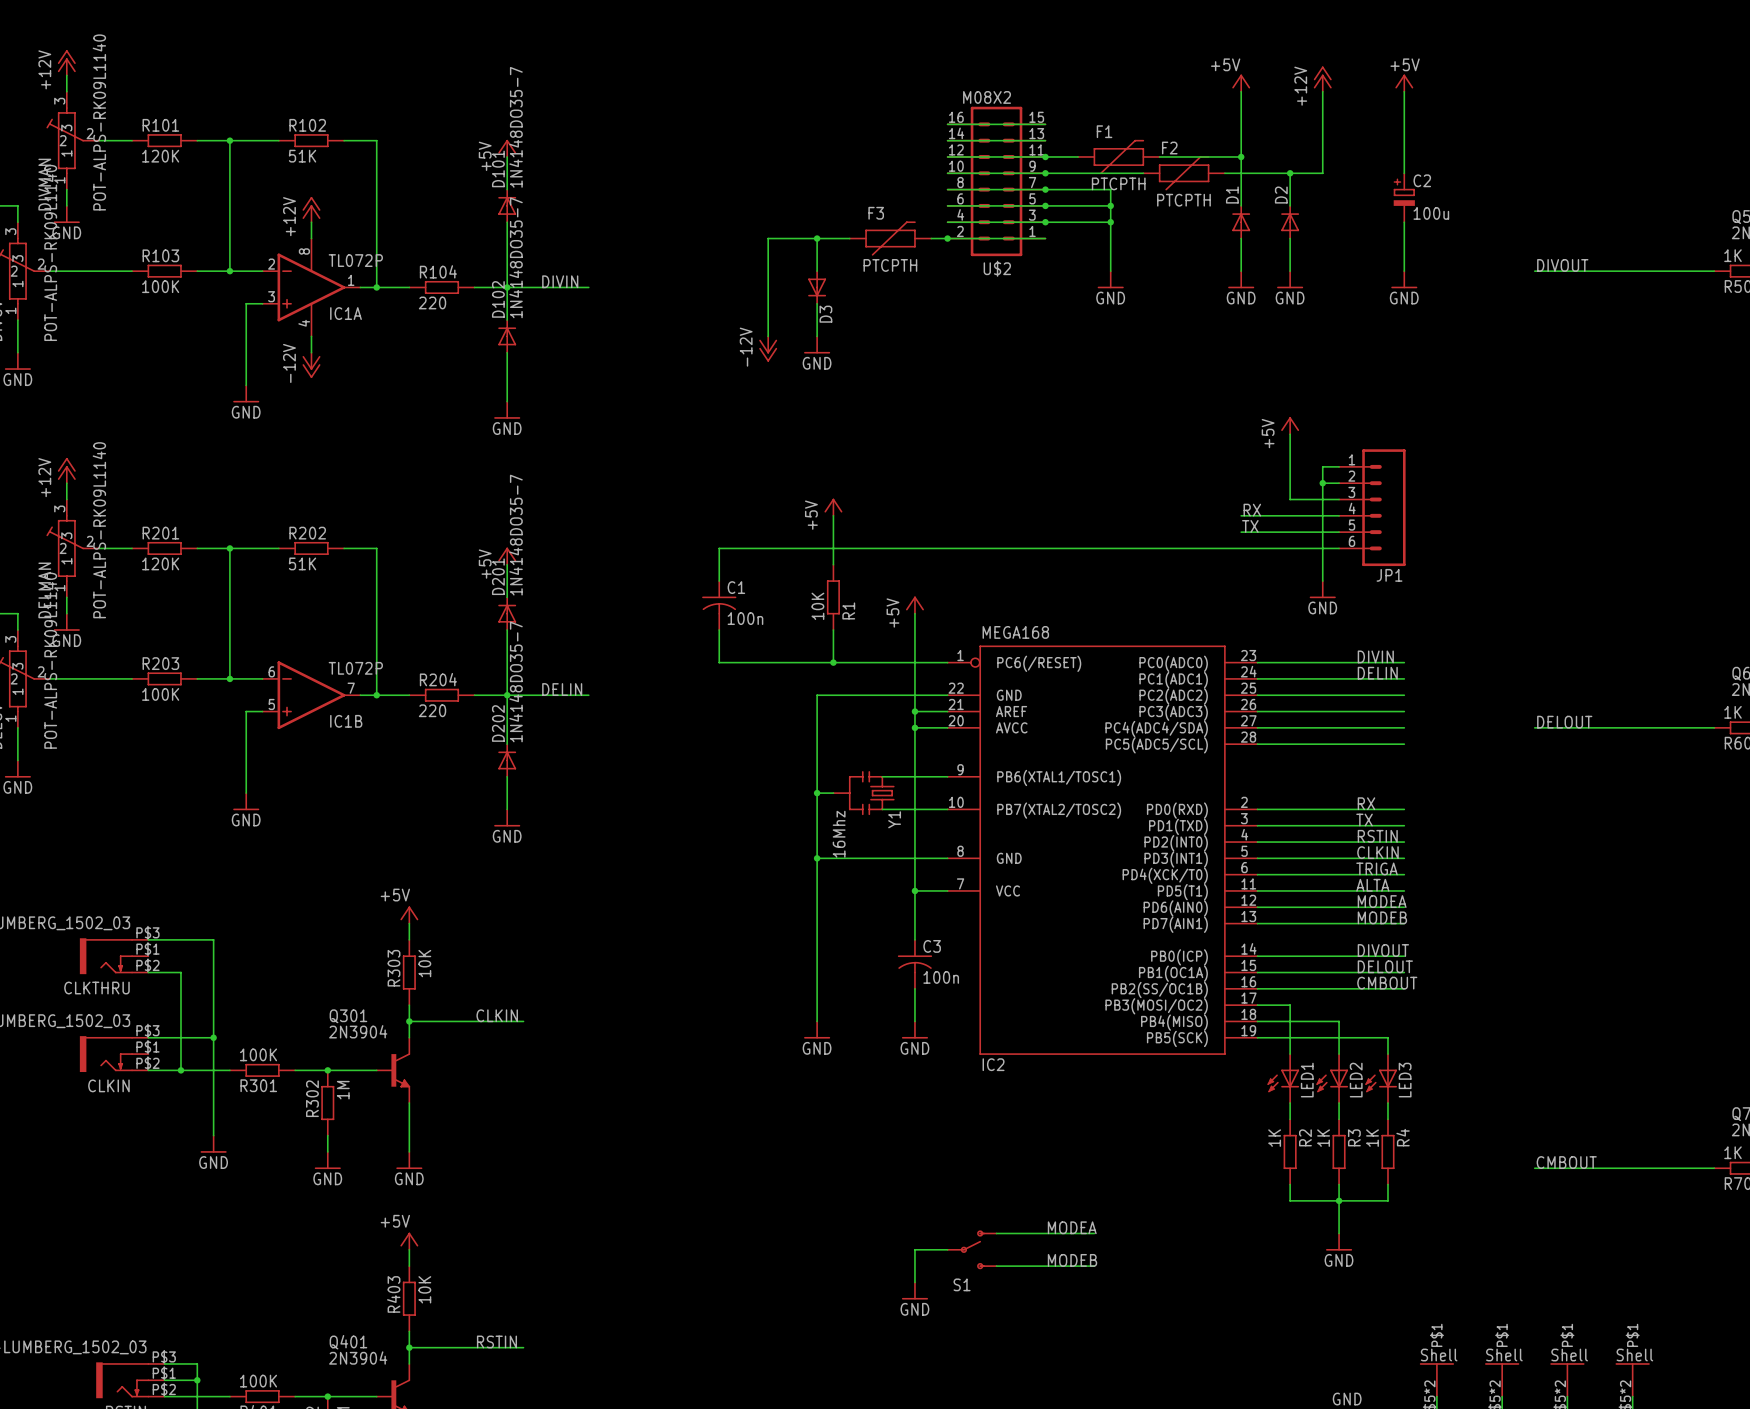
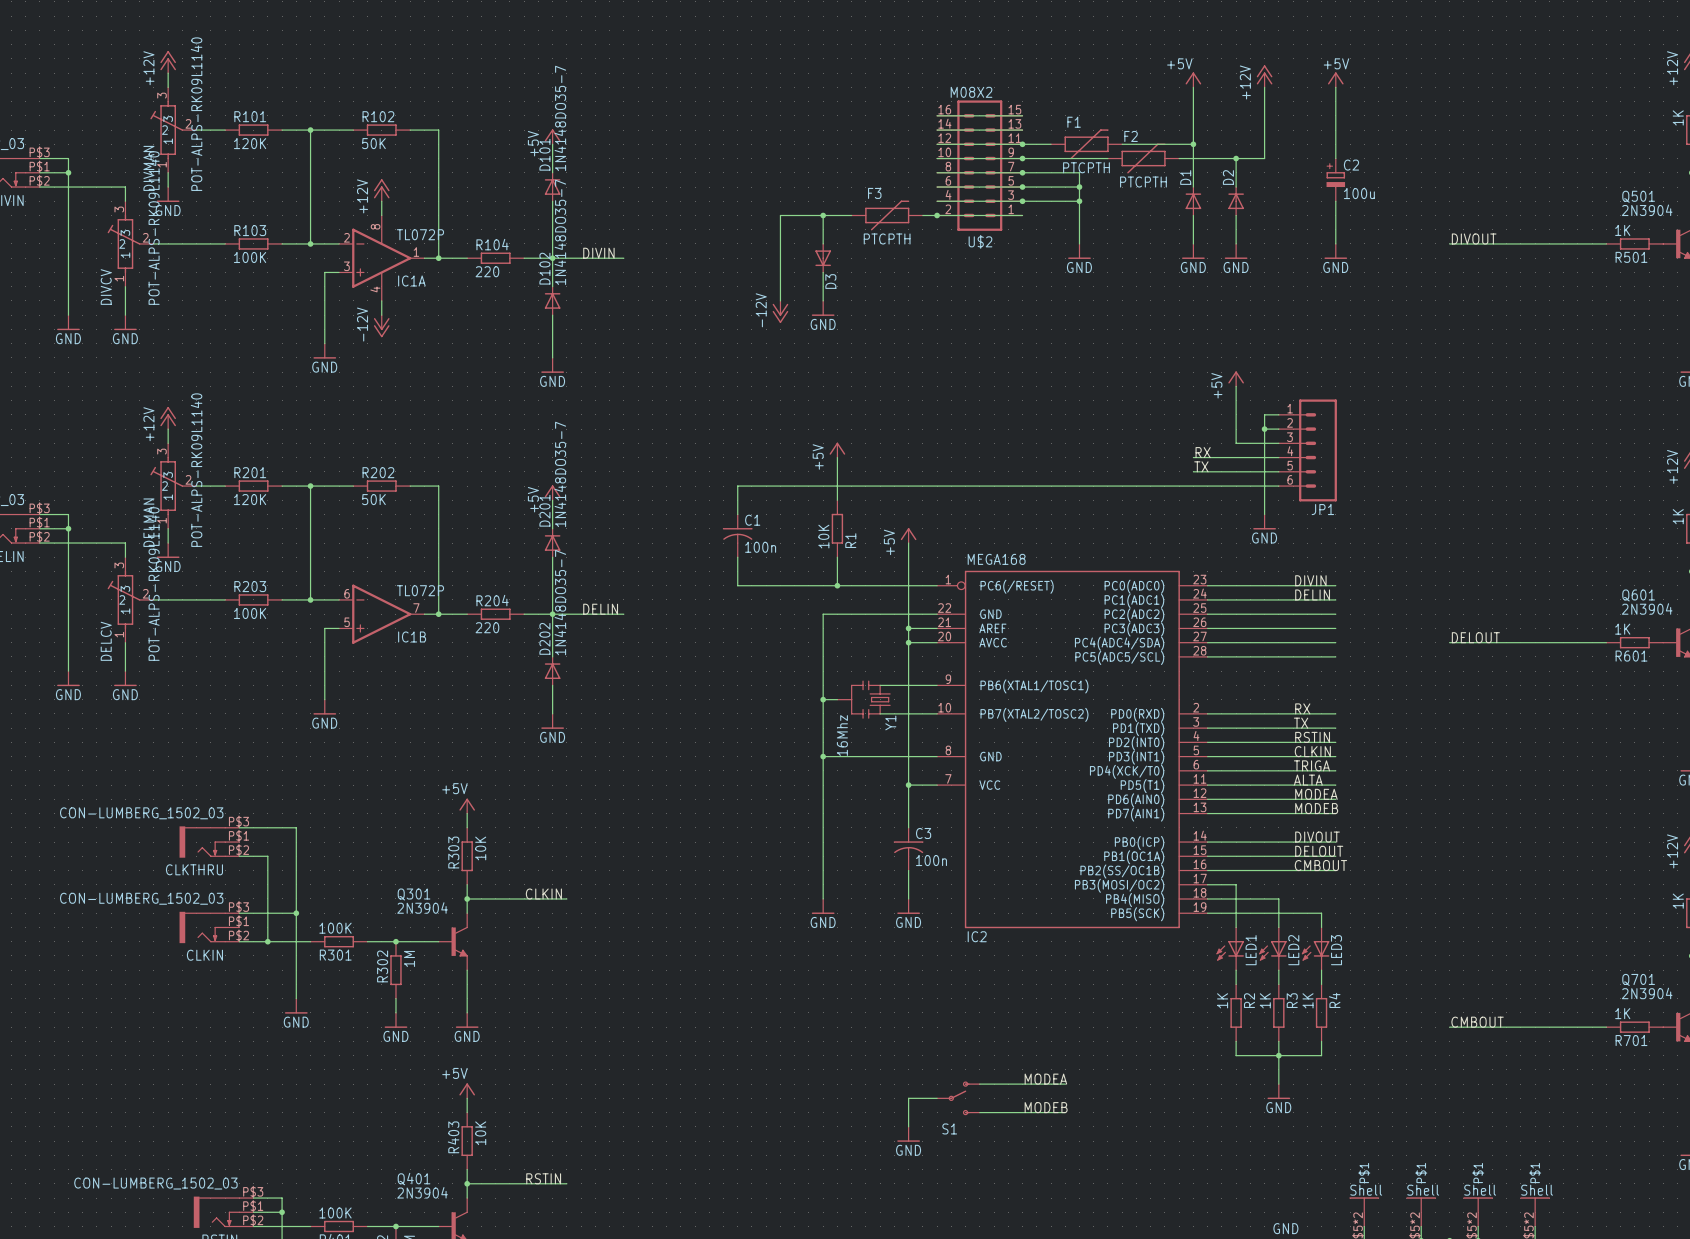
R102 value: 51K (302, 156) -> 50K (373, 143)
R202 value: 51K (302, 563) -> 50K (373, 499)

